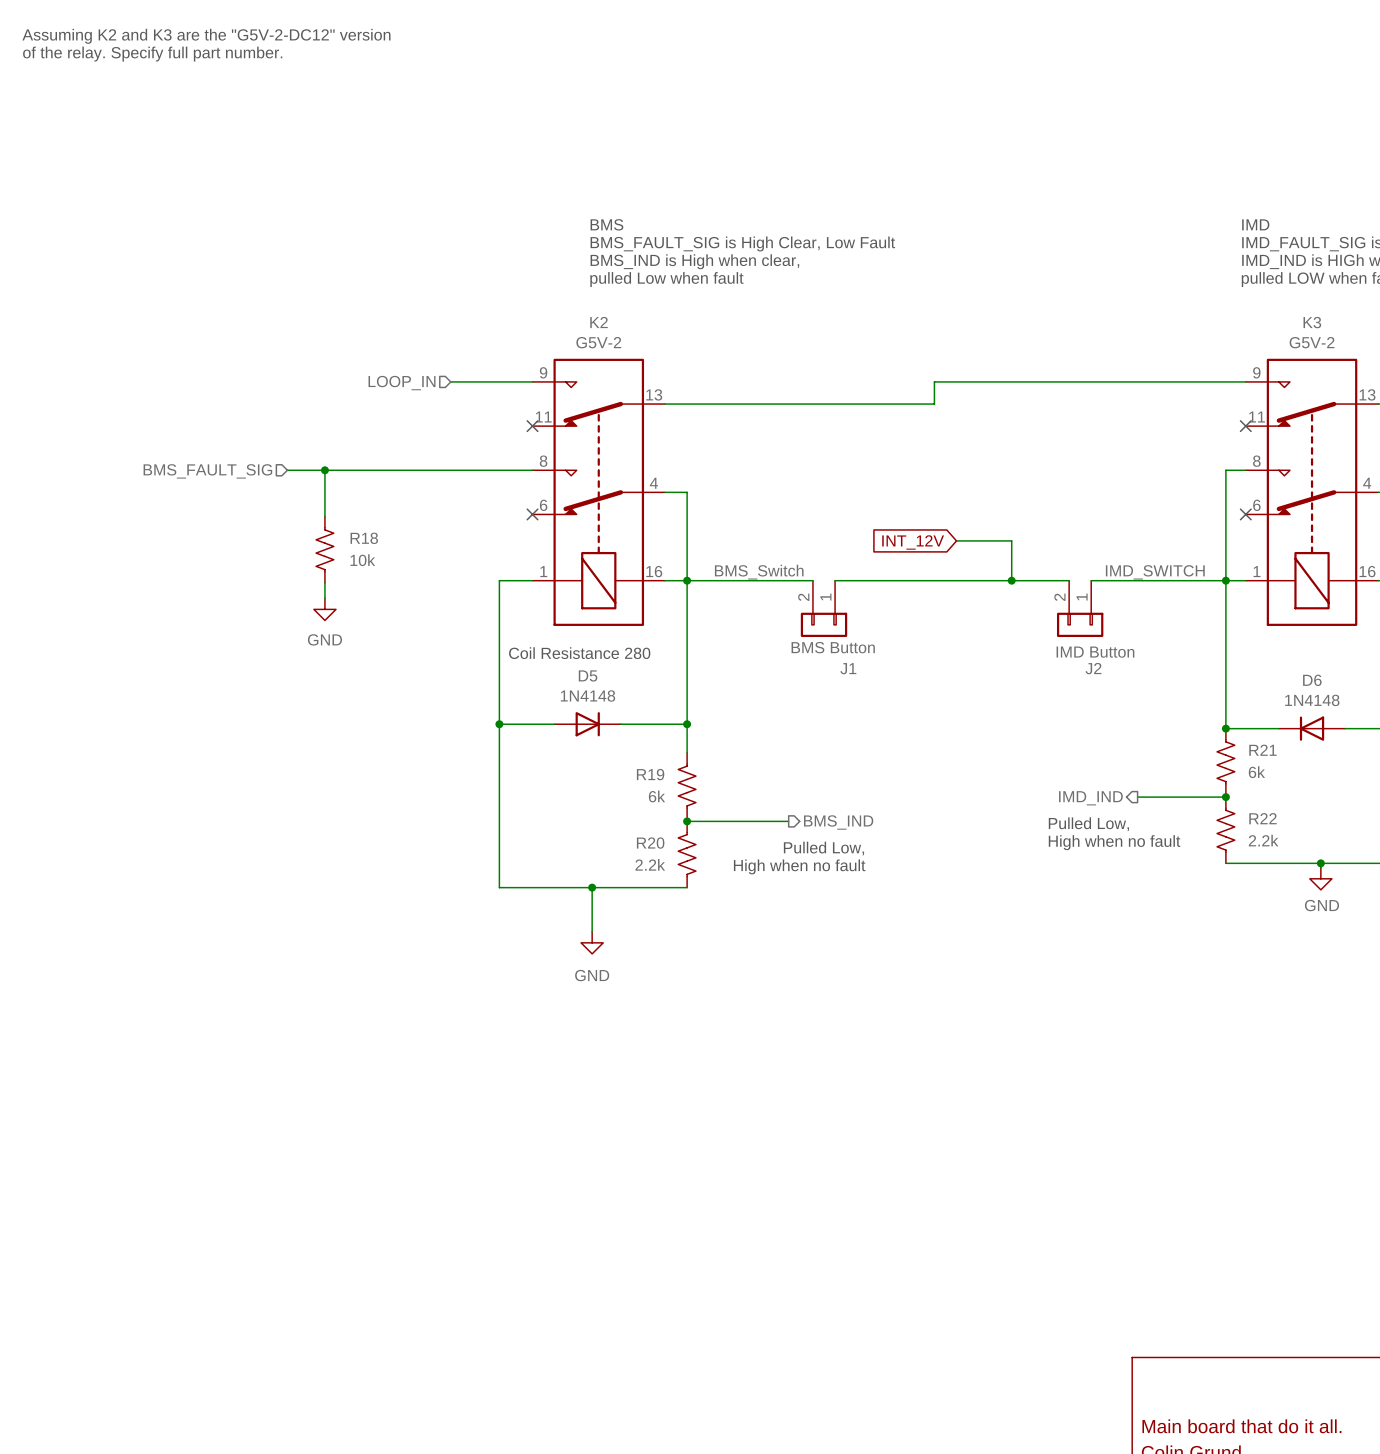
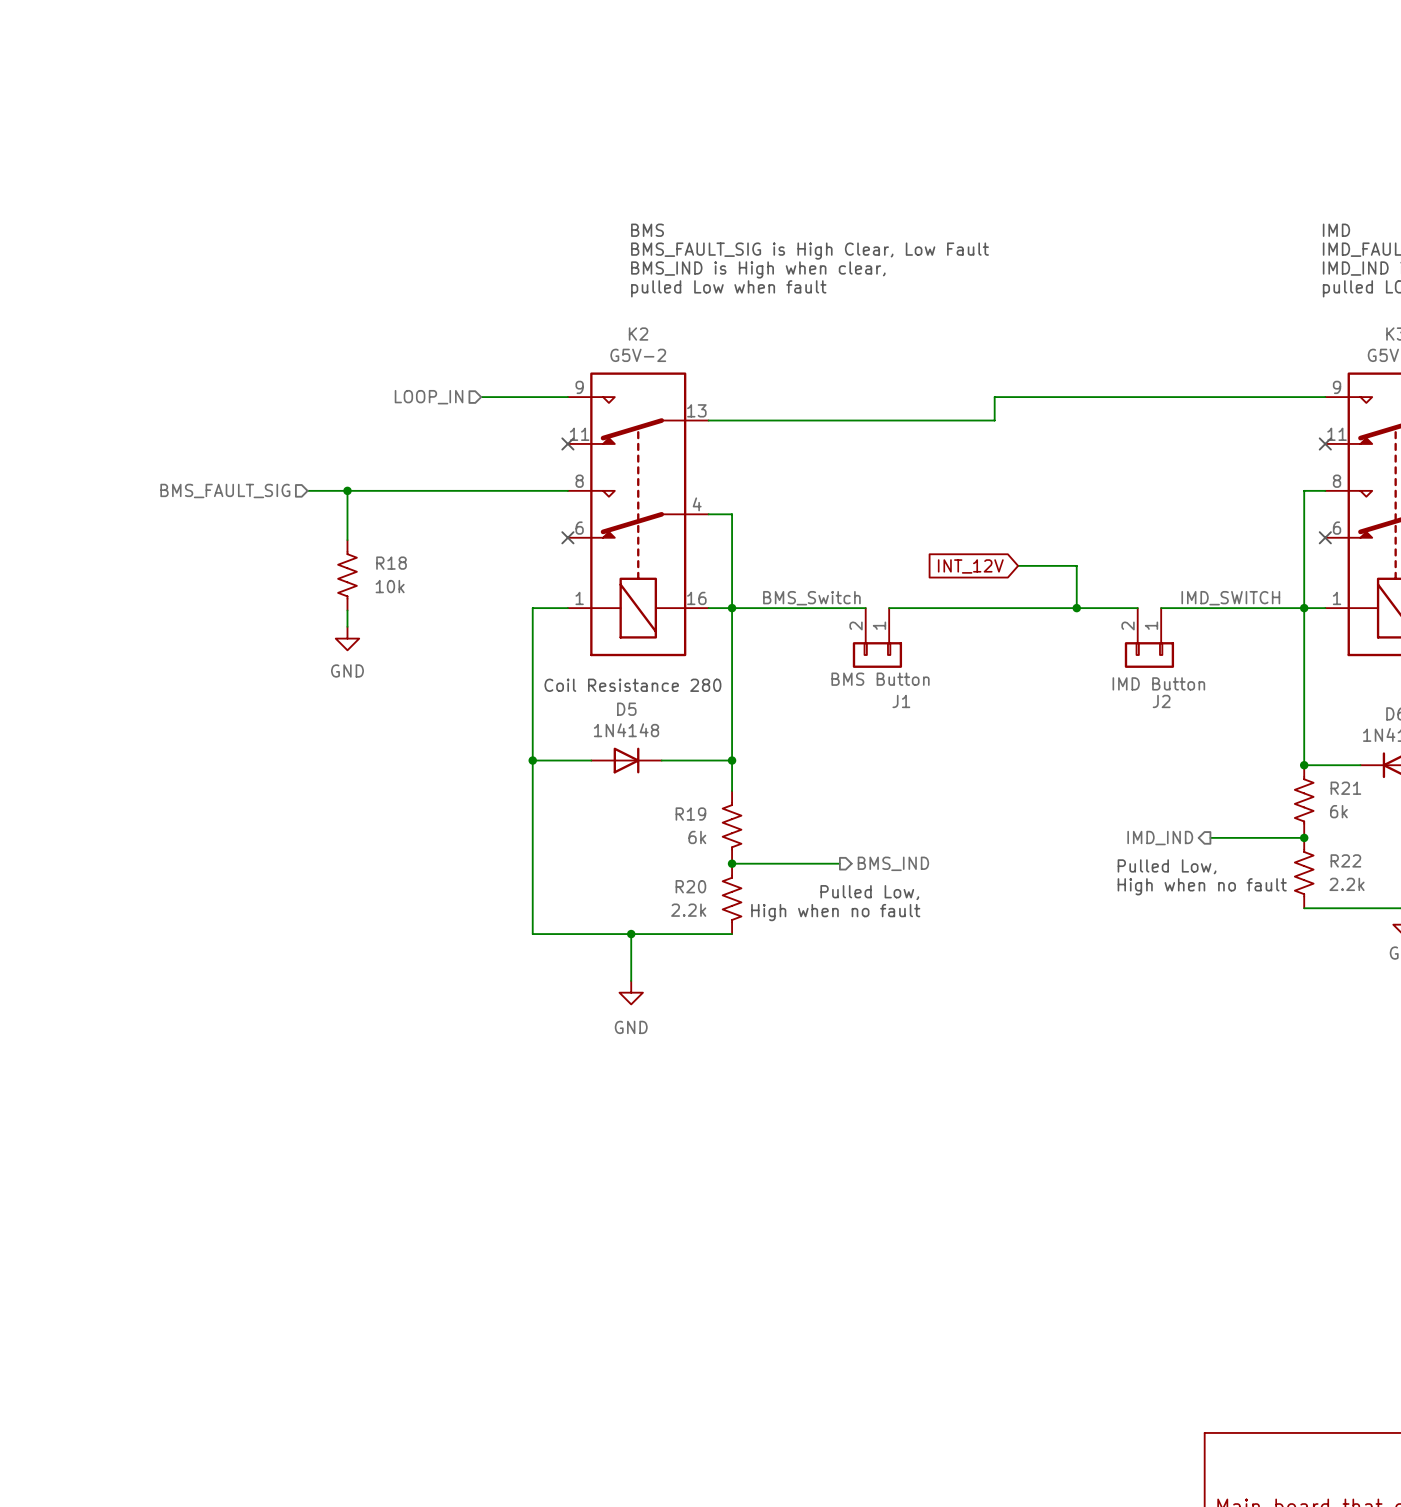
text: Assuming K2 and K3 are the "G5V-2-DC12" version (206, 36) -> none
text: of the relay. Specify full part number. (152, 54) -> none

